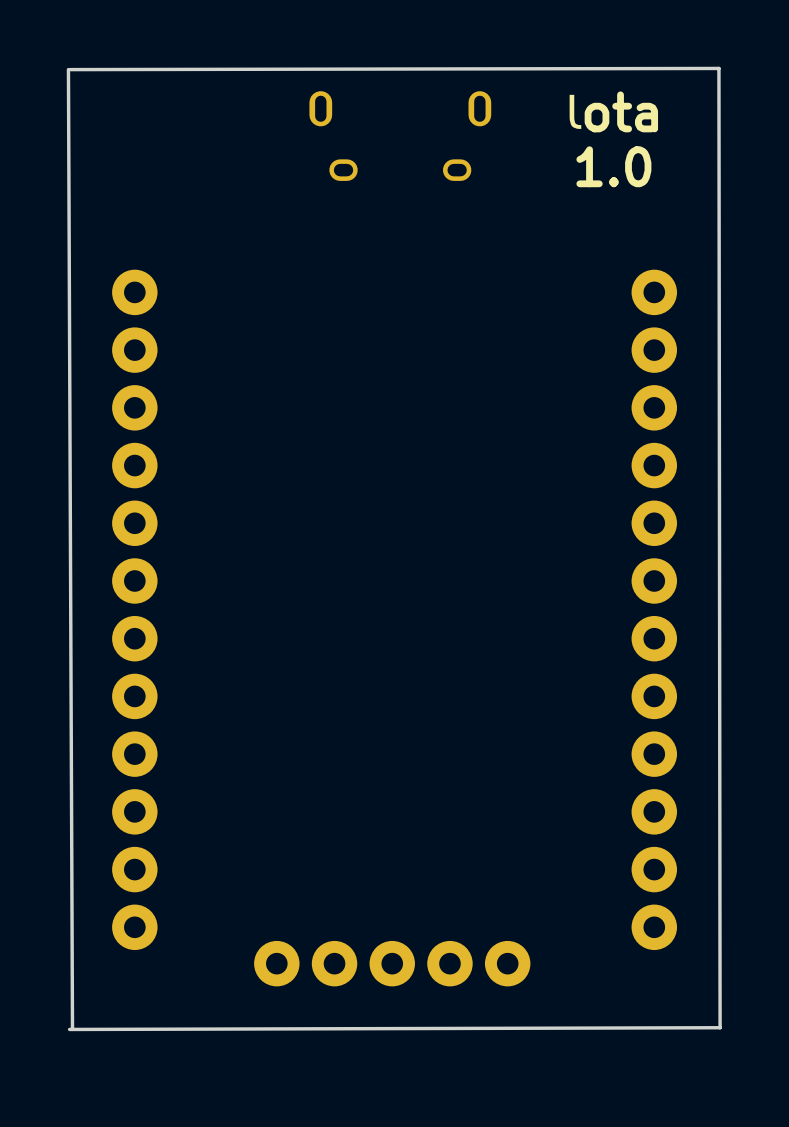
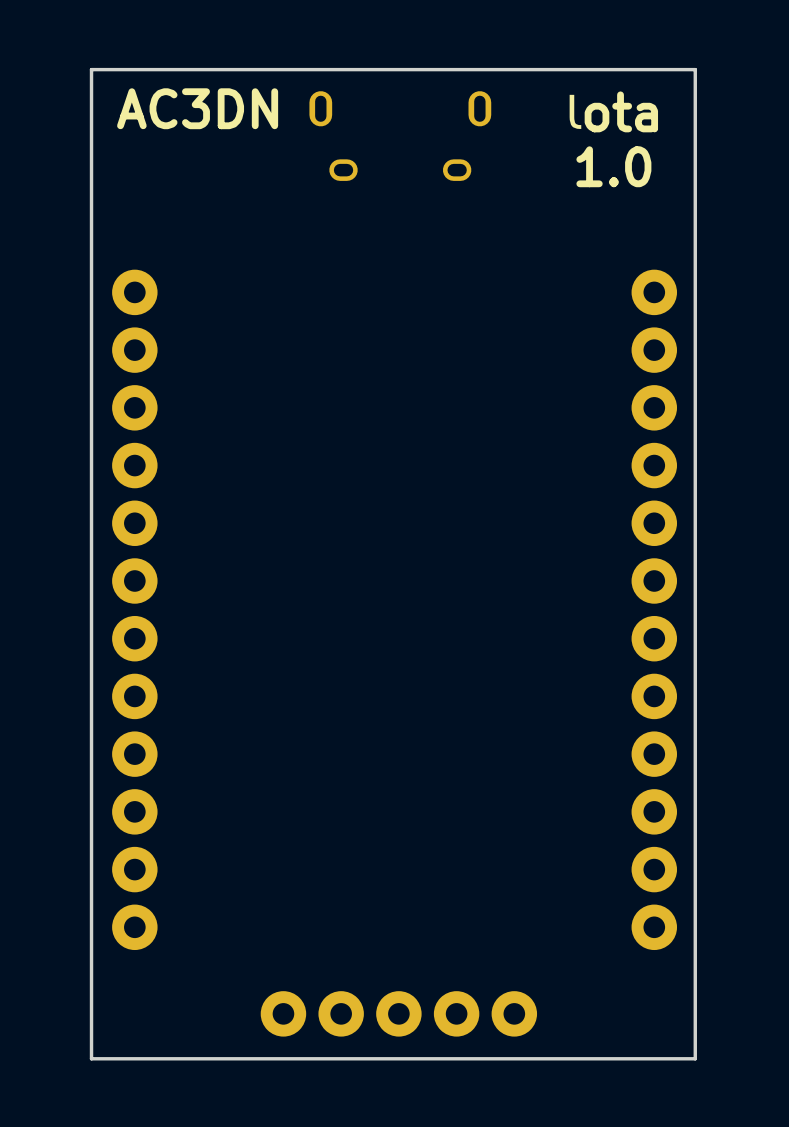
board edge: (68, 69) (72, 1028) -> none
board edge: (70, 69) (718, 68) (720, 1027) (69, 1029) -> none
board edge: none -> (695, 69) (695, 1058) (91, 1058) (91, 69) (695, 69)
text: none -> AC3DN (197, 108)
part position: (392, 963) -> (398, 1013)

